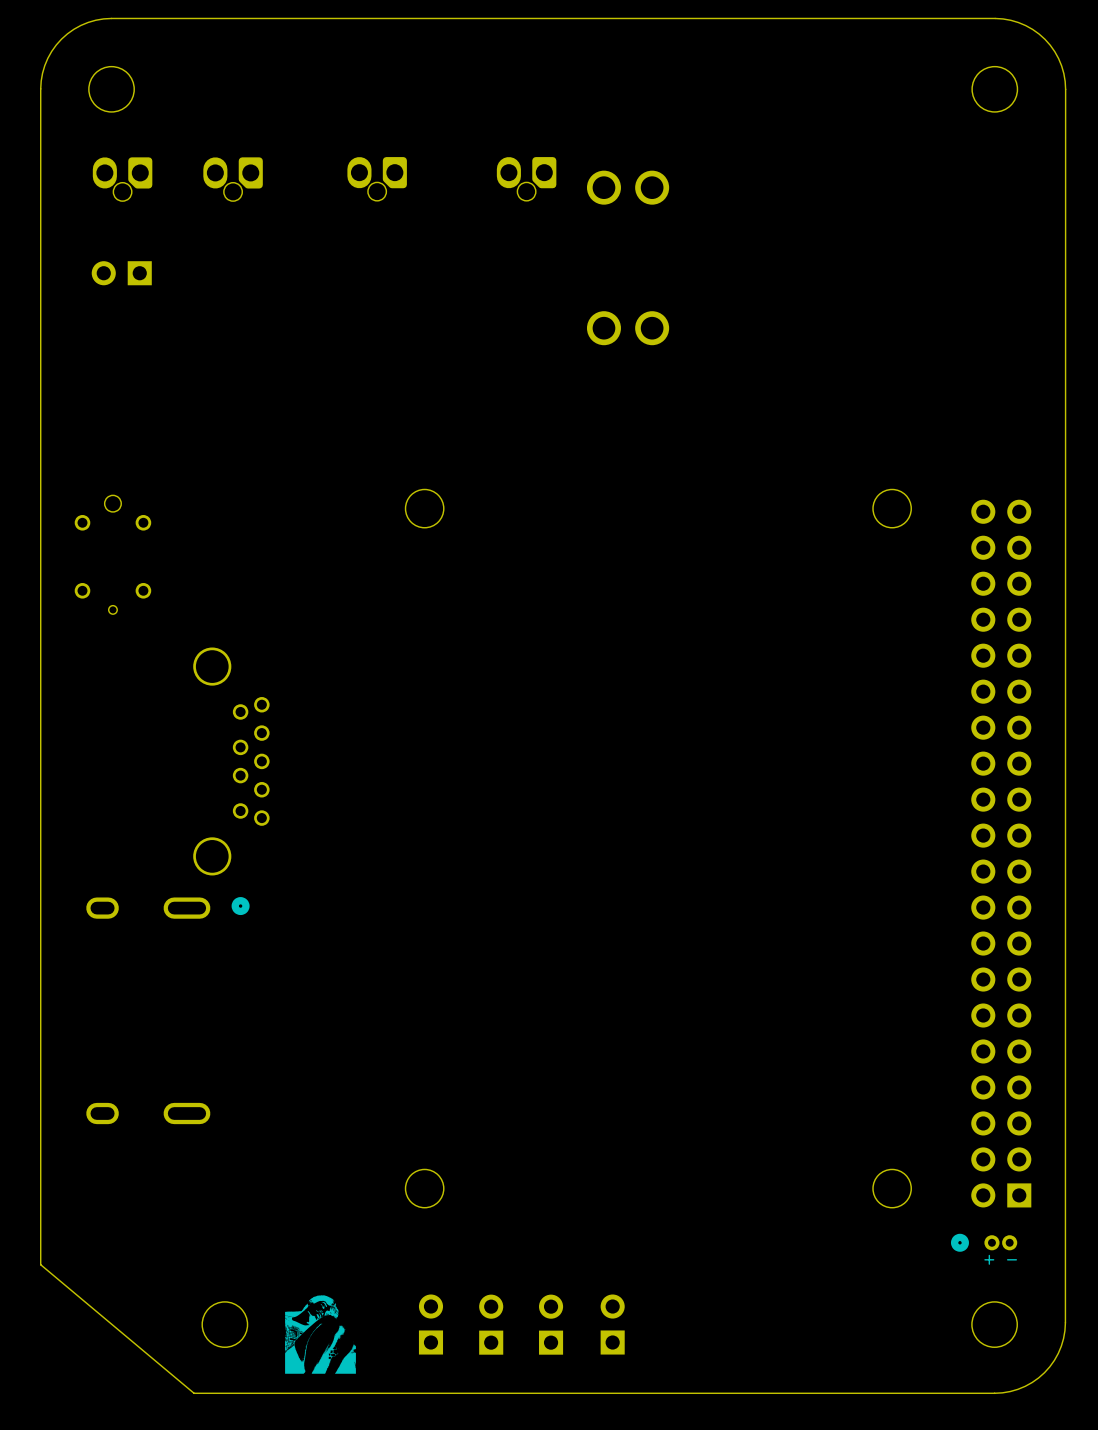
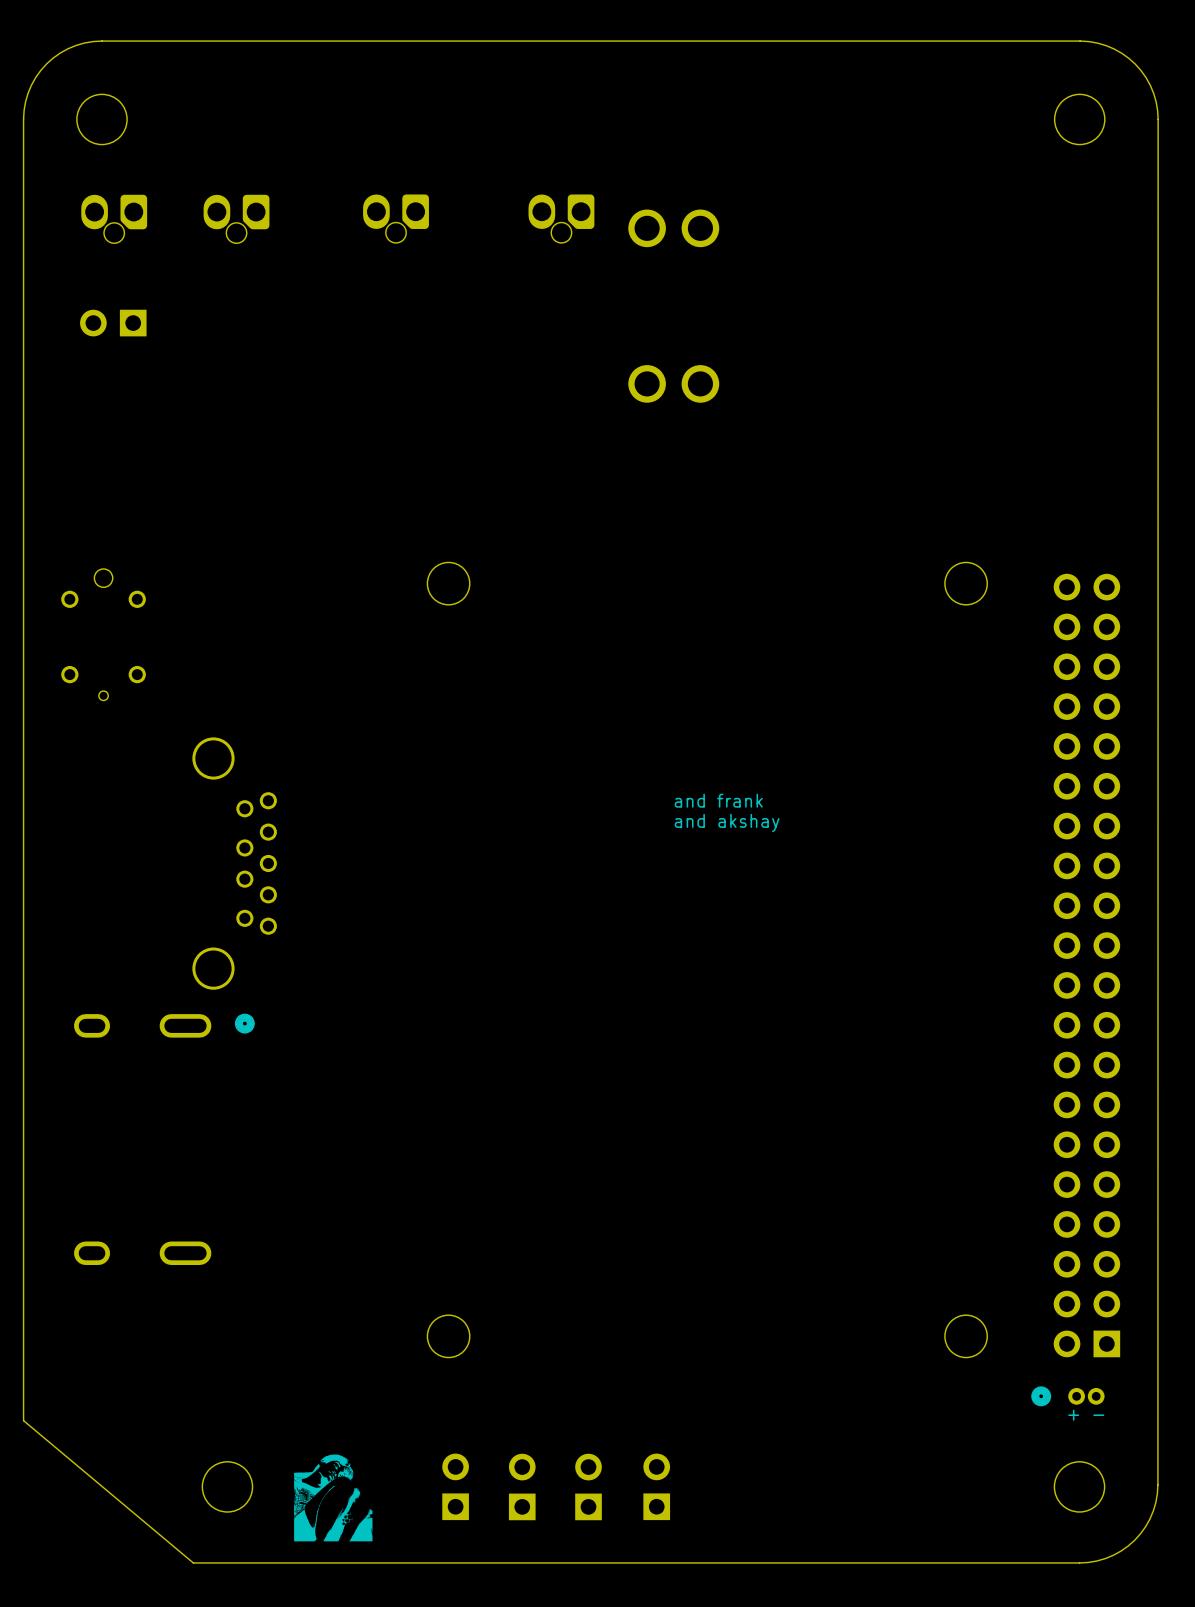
text: none -> and frank (718, 800)
text: none -> and akshay (727, 822)

